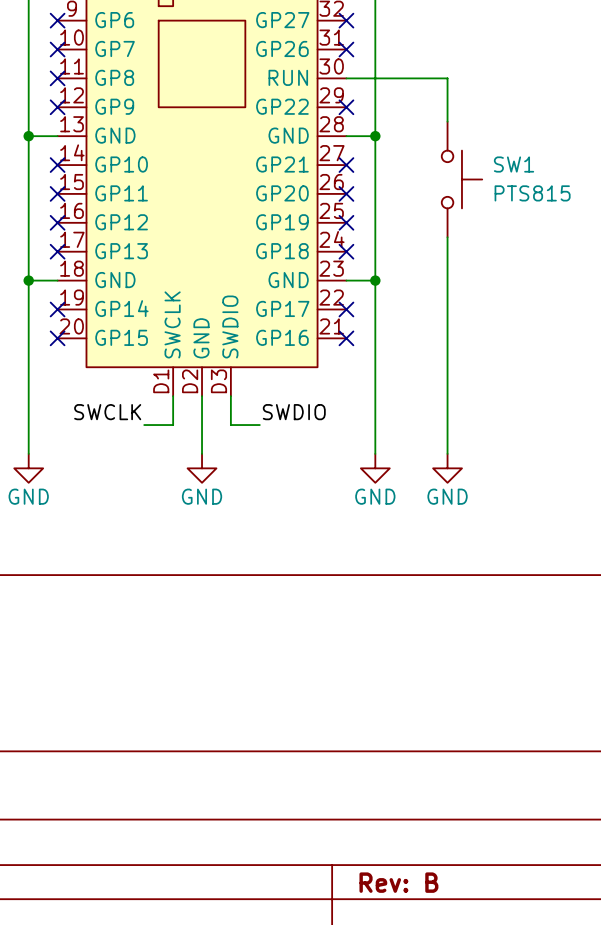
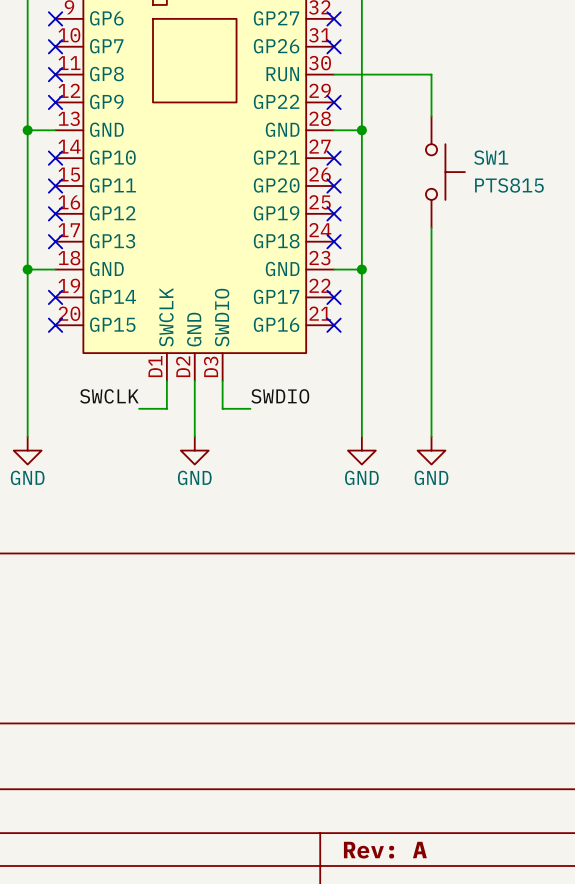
title block: Rev: B (398, 882) -> Rev: A (385, 850)

